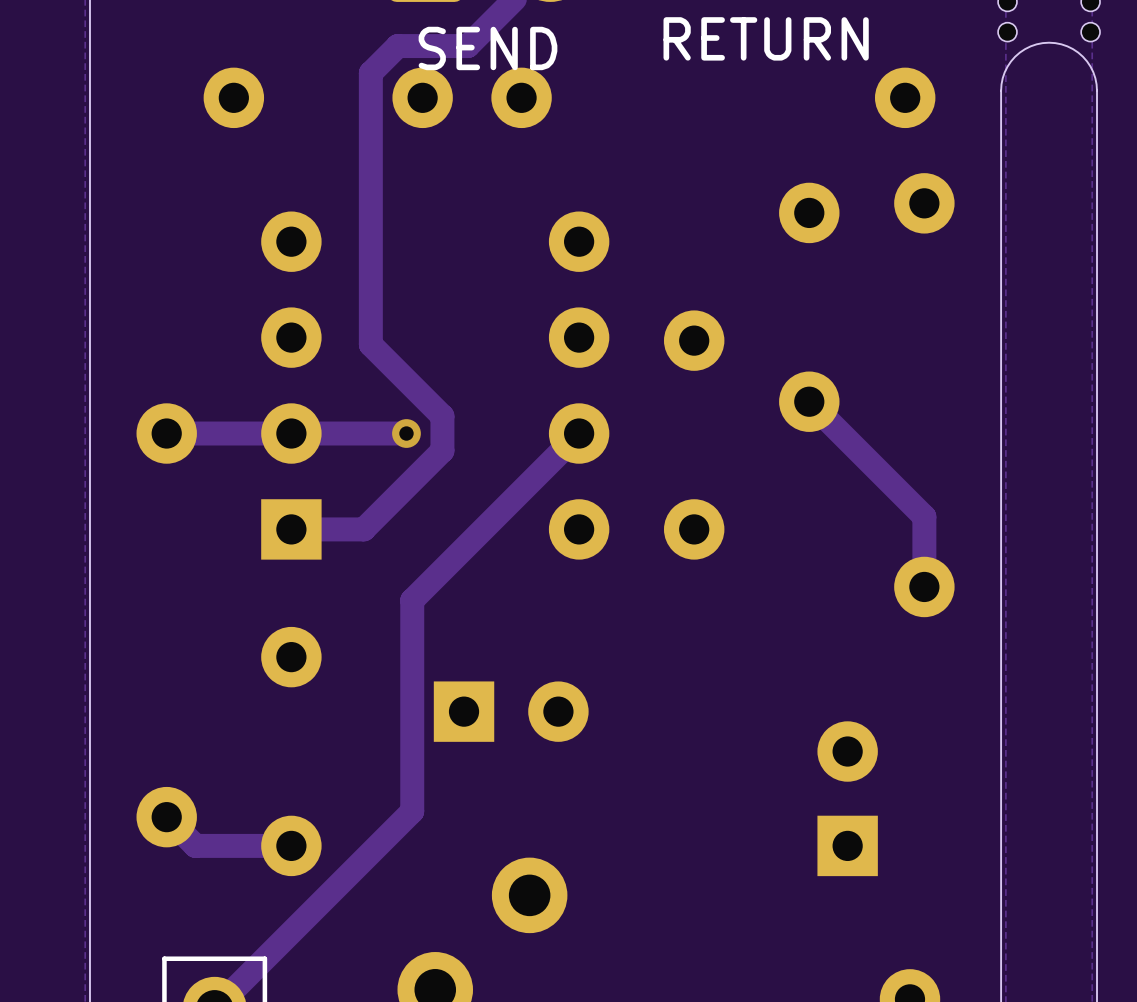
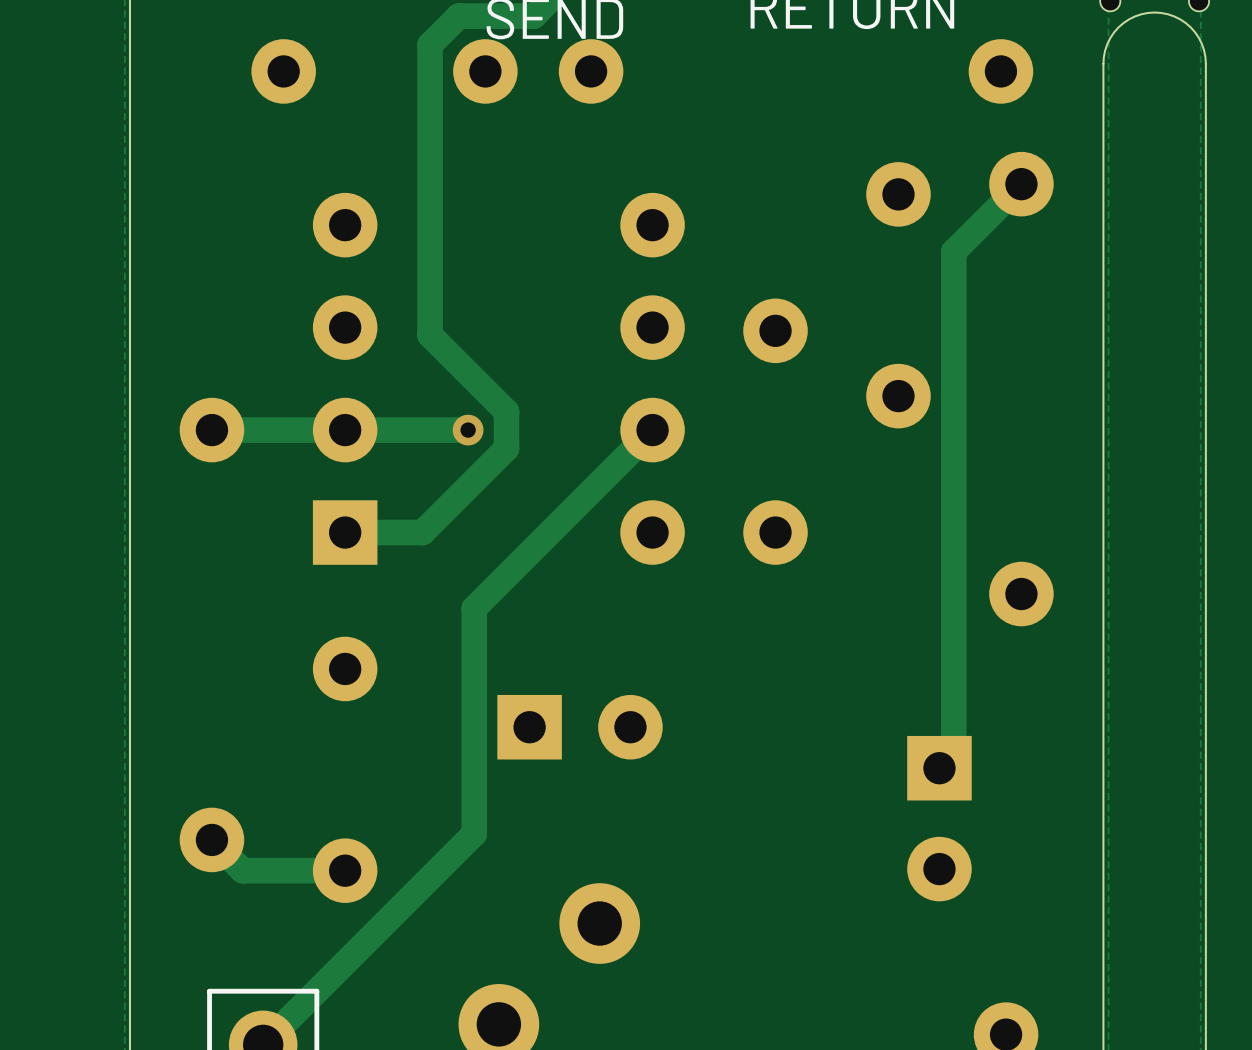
track: none -> (1021, 184) (953, 251) (953, 753) (939, 768)
track: (809, 401) (924, 516) (924, 586) -> none
part rotation: 0° (847, 798) -> 180° (939, 818)

